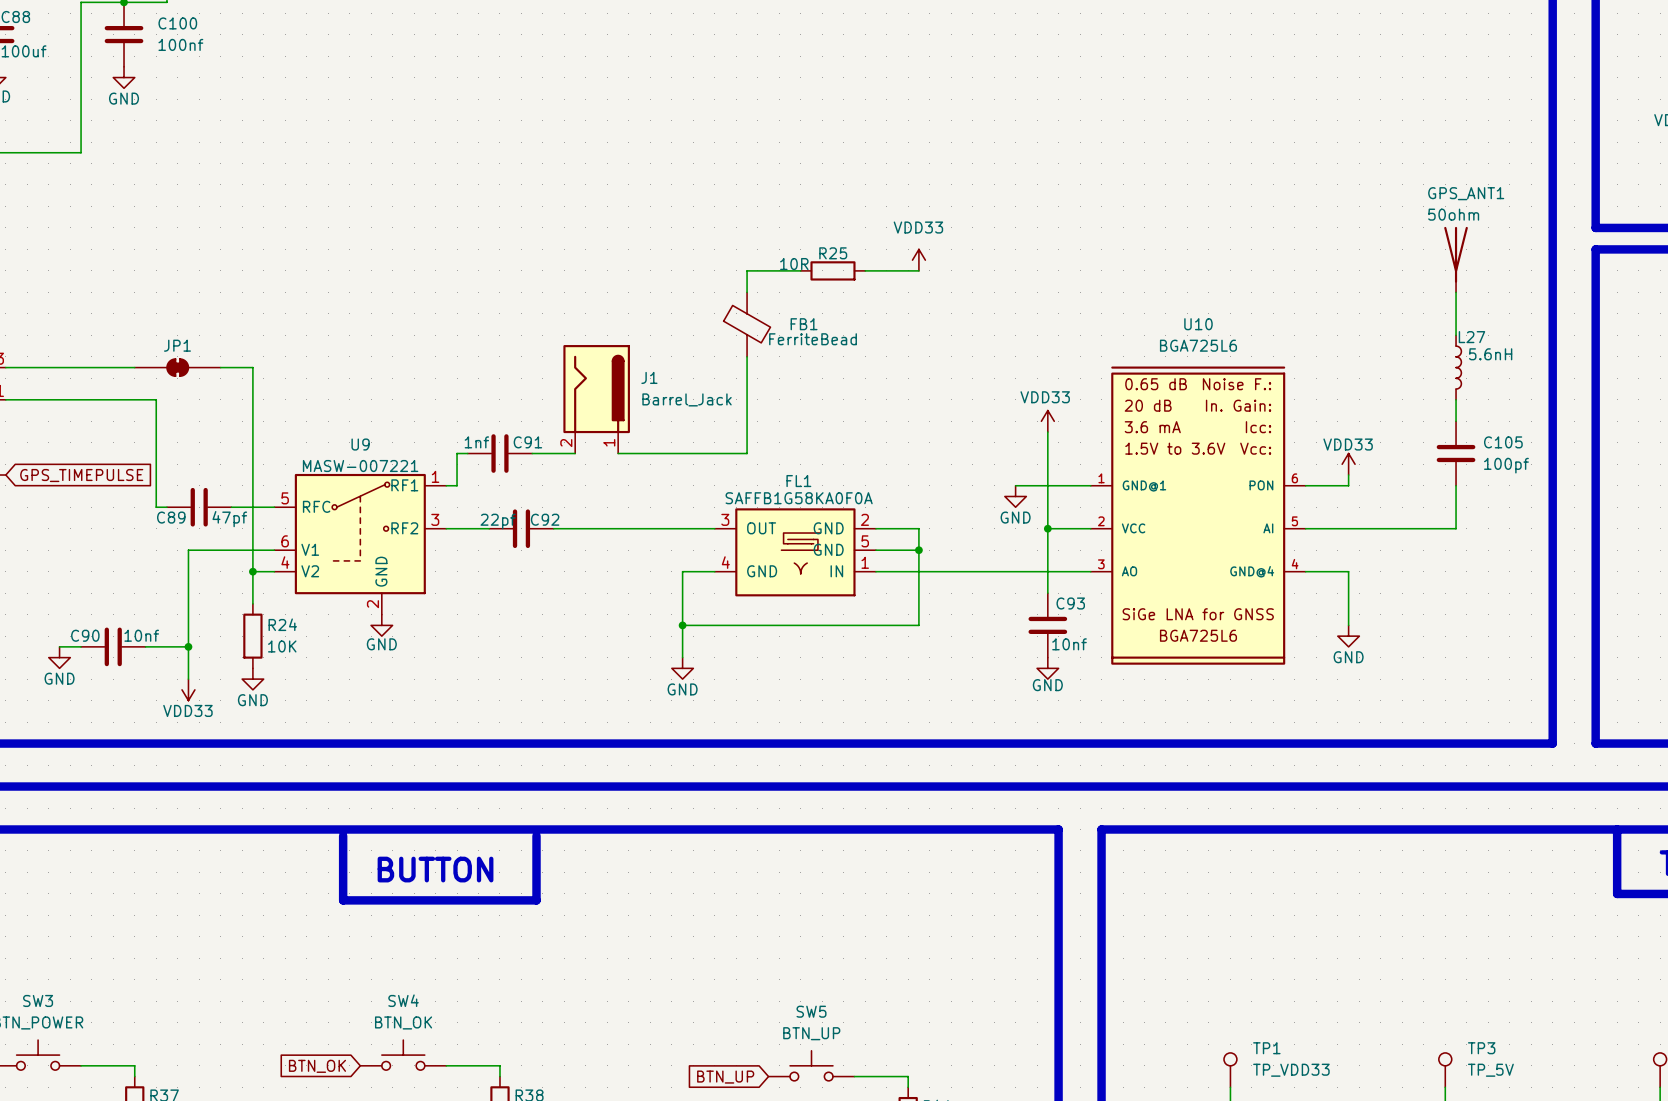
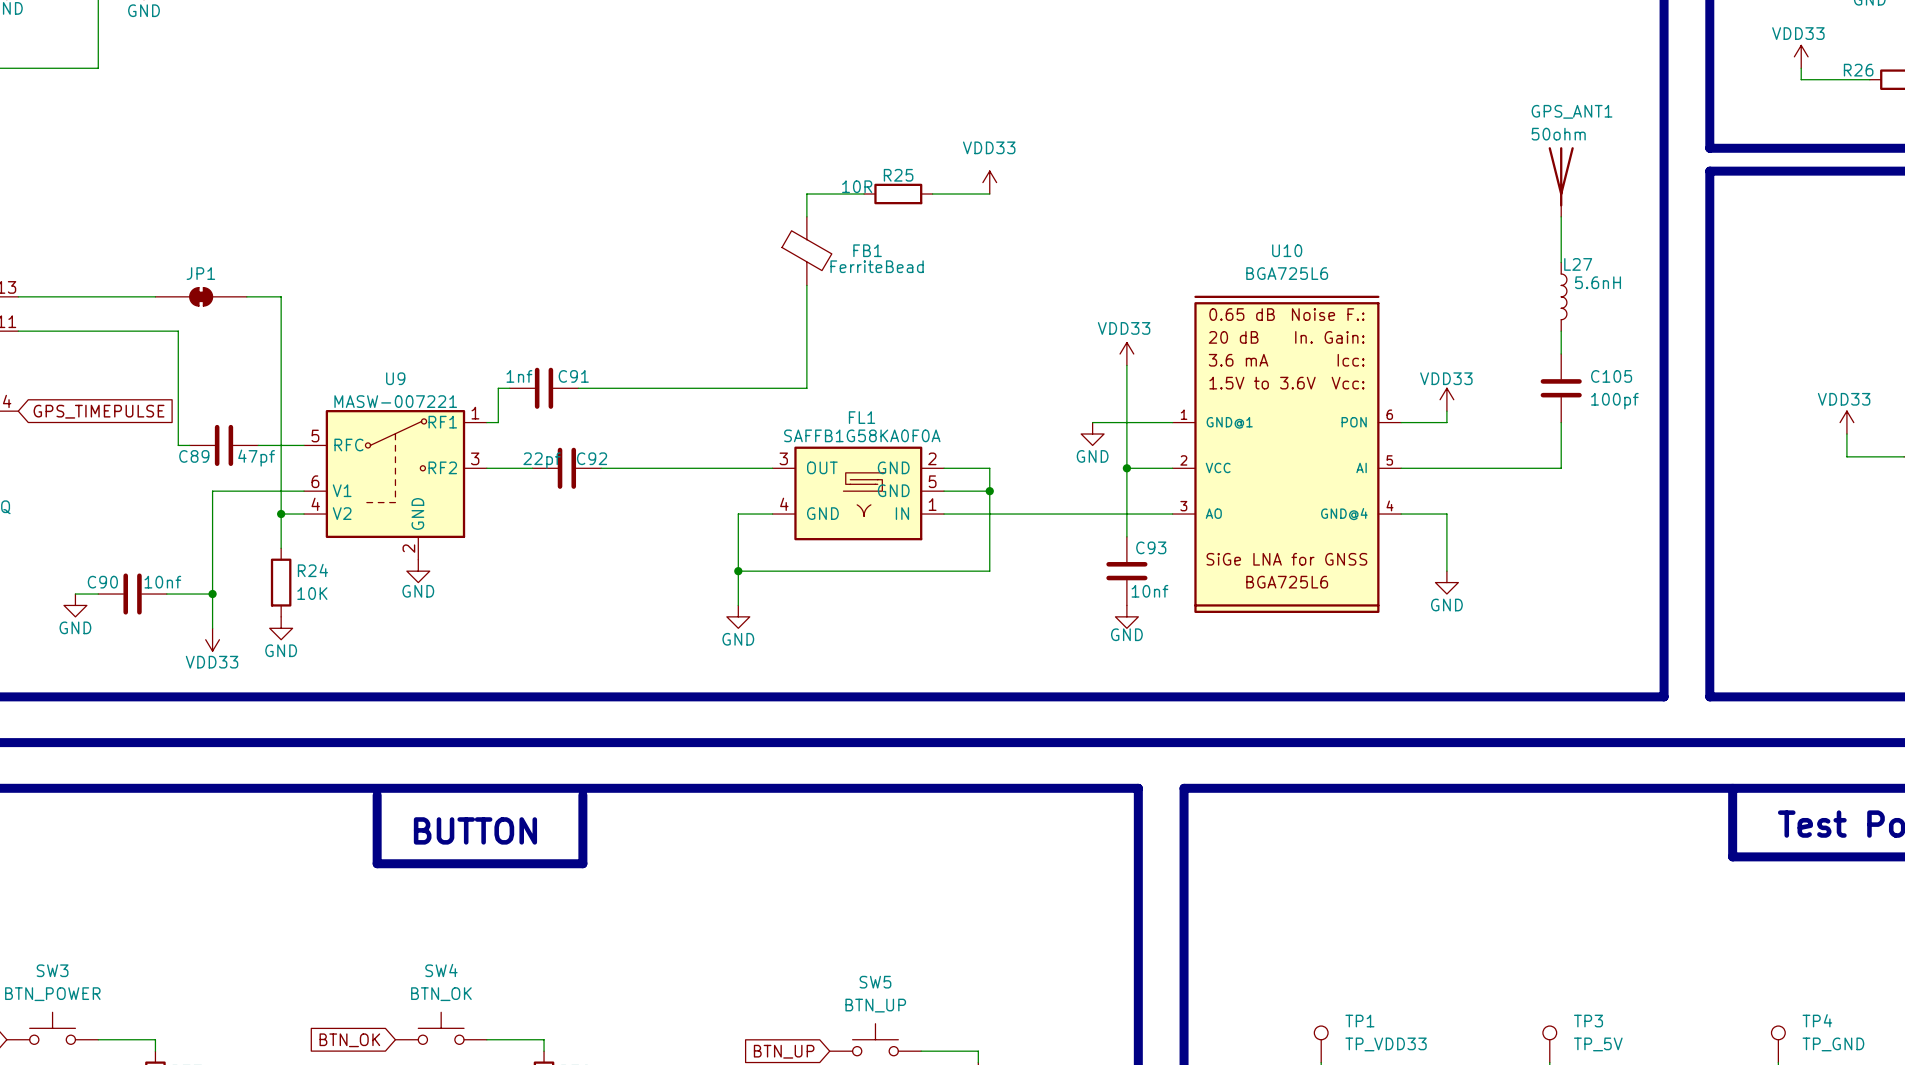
J1: Barrel_Jack (596, 399) -> none
wire: none -> (624, 388) (669, 388)

